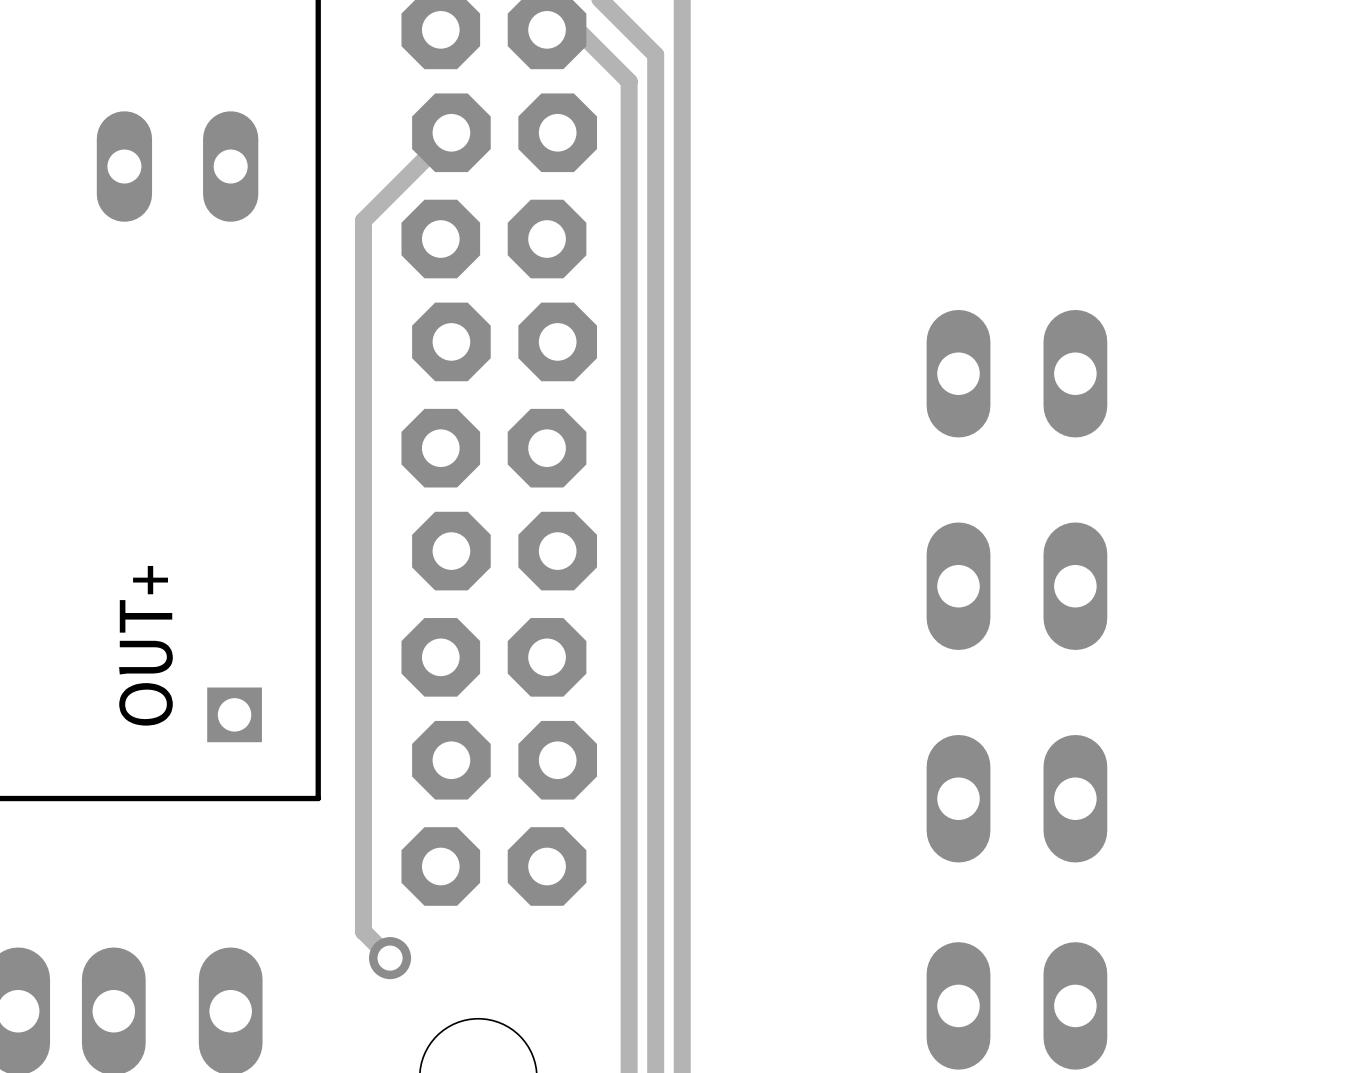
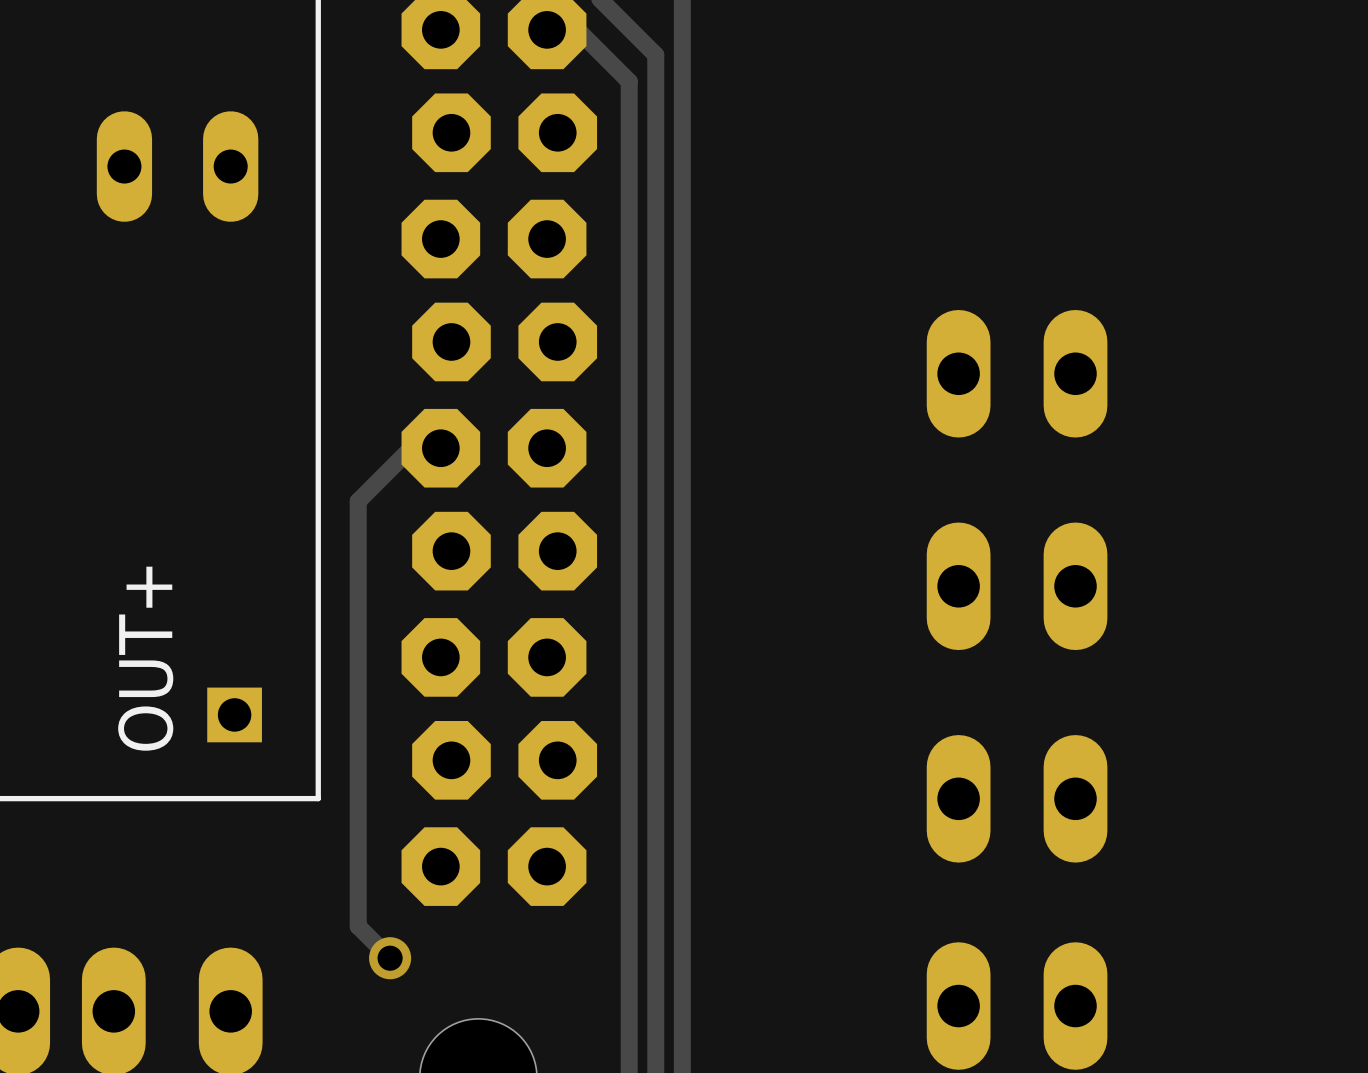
track: (451, 132) (363, 220) (363, 931) -> (440, 448) (411, 448) (358, 501) (358, 926) (363, 931)

